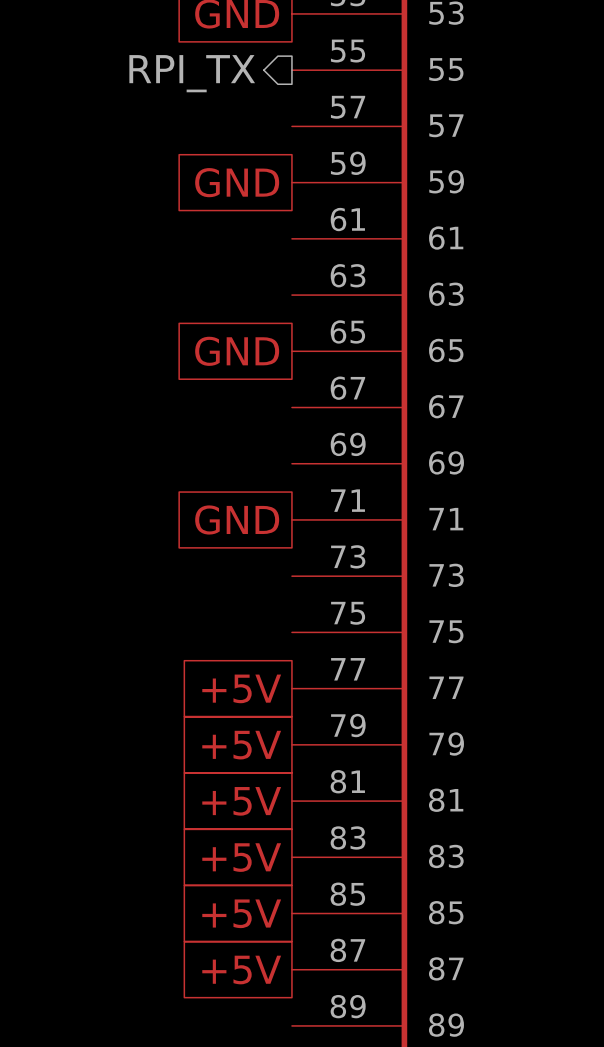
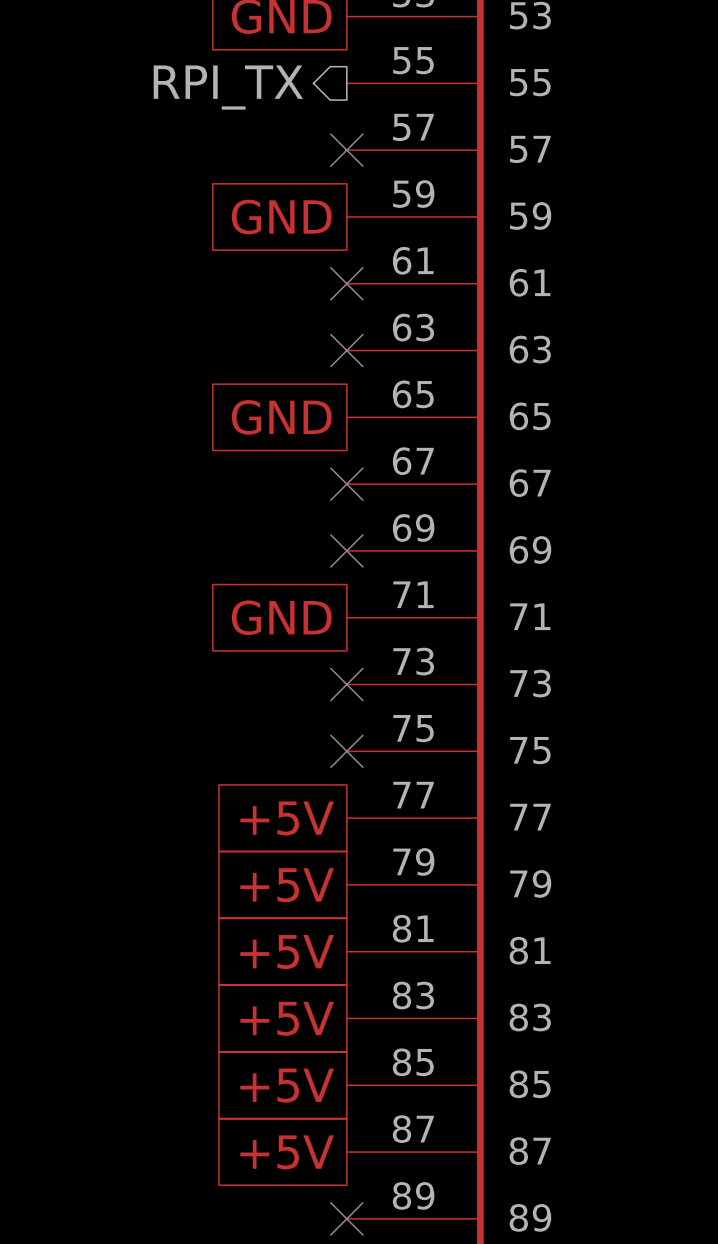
no-connect mark: none -> (346, 150)
no-connect mark: none -> (346, 283)
no-connect mark: none -> (346, 350)
no-connect mark: none -> (346, 484)
no-connect mark: none -> (346, 550)
no-connect mark: none -> (346, 684)
no-connect mark: none -> (346, 751)
no-connect mark: none -> (346, 1218)

